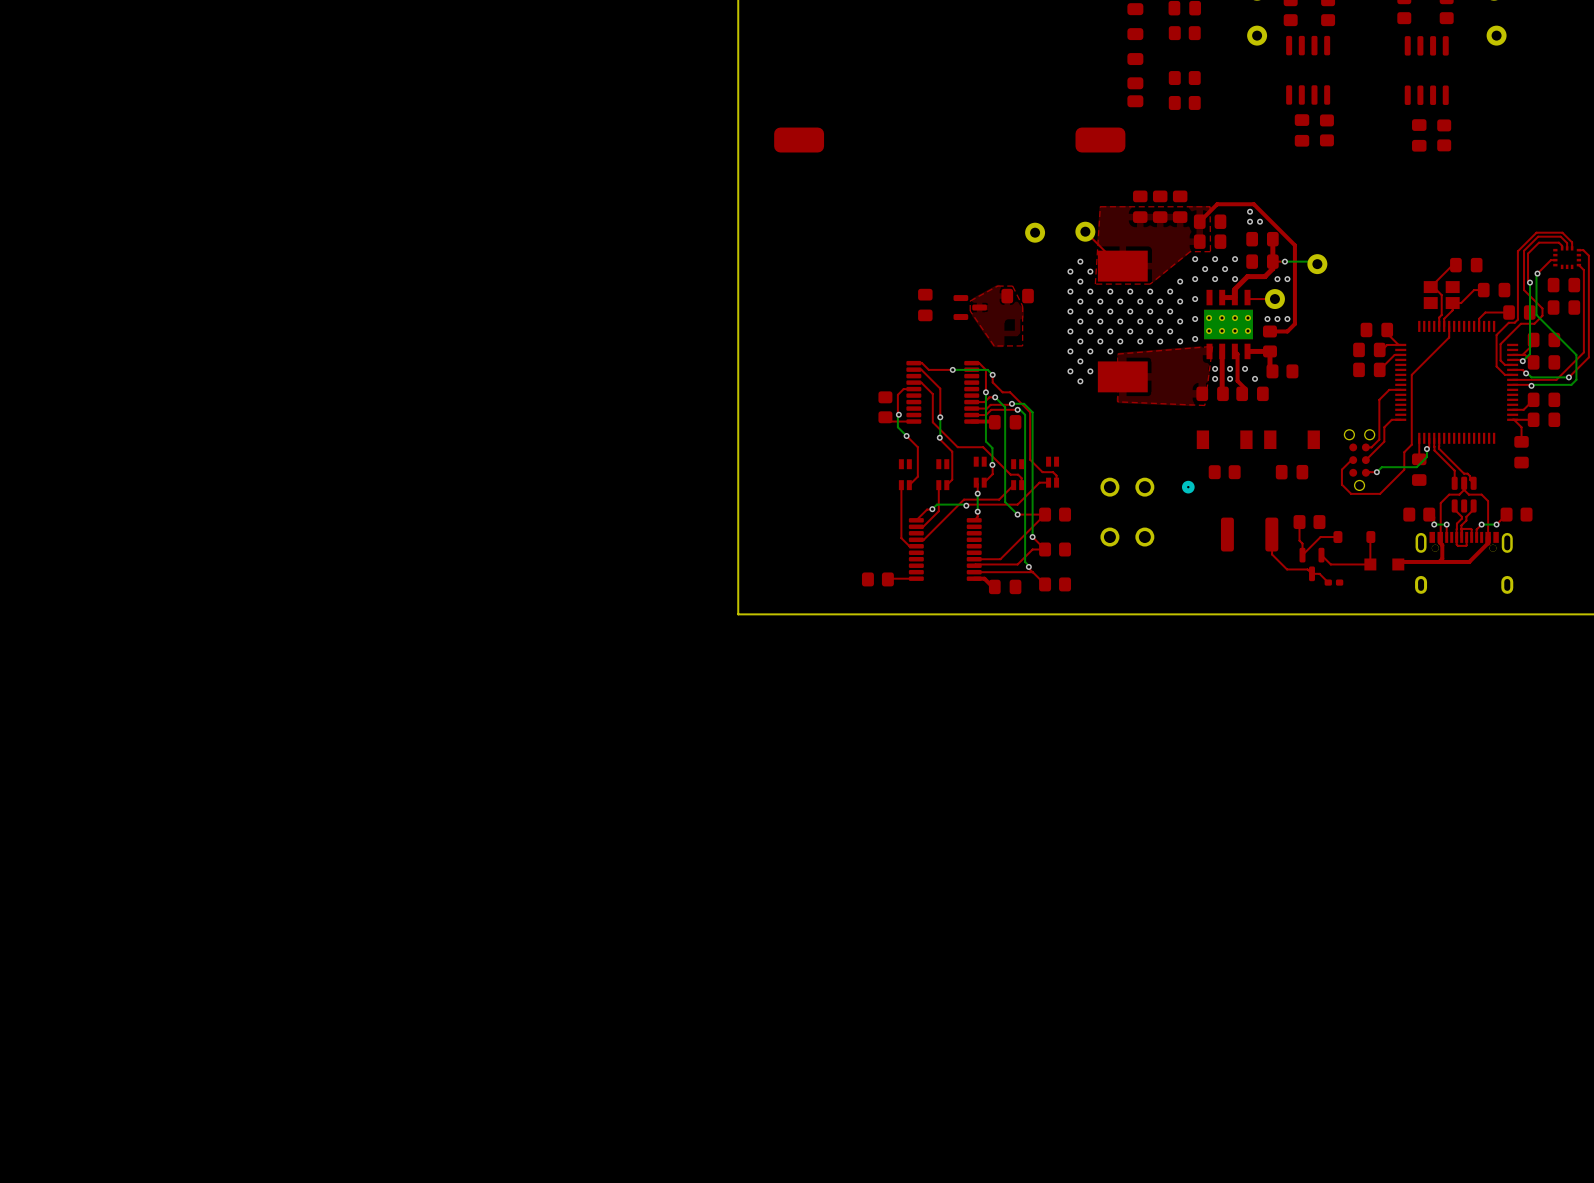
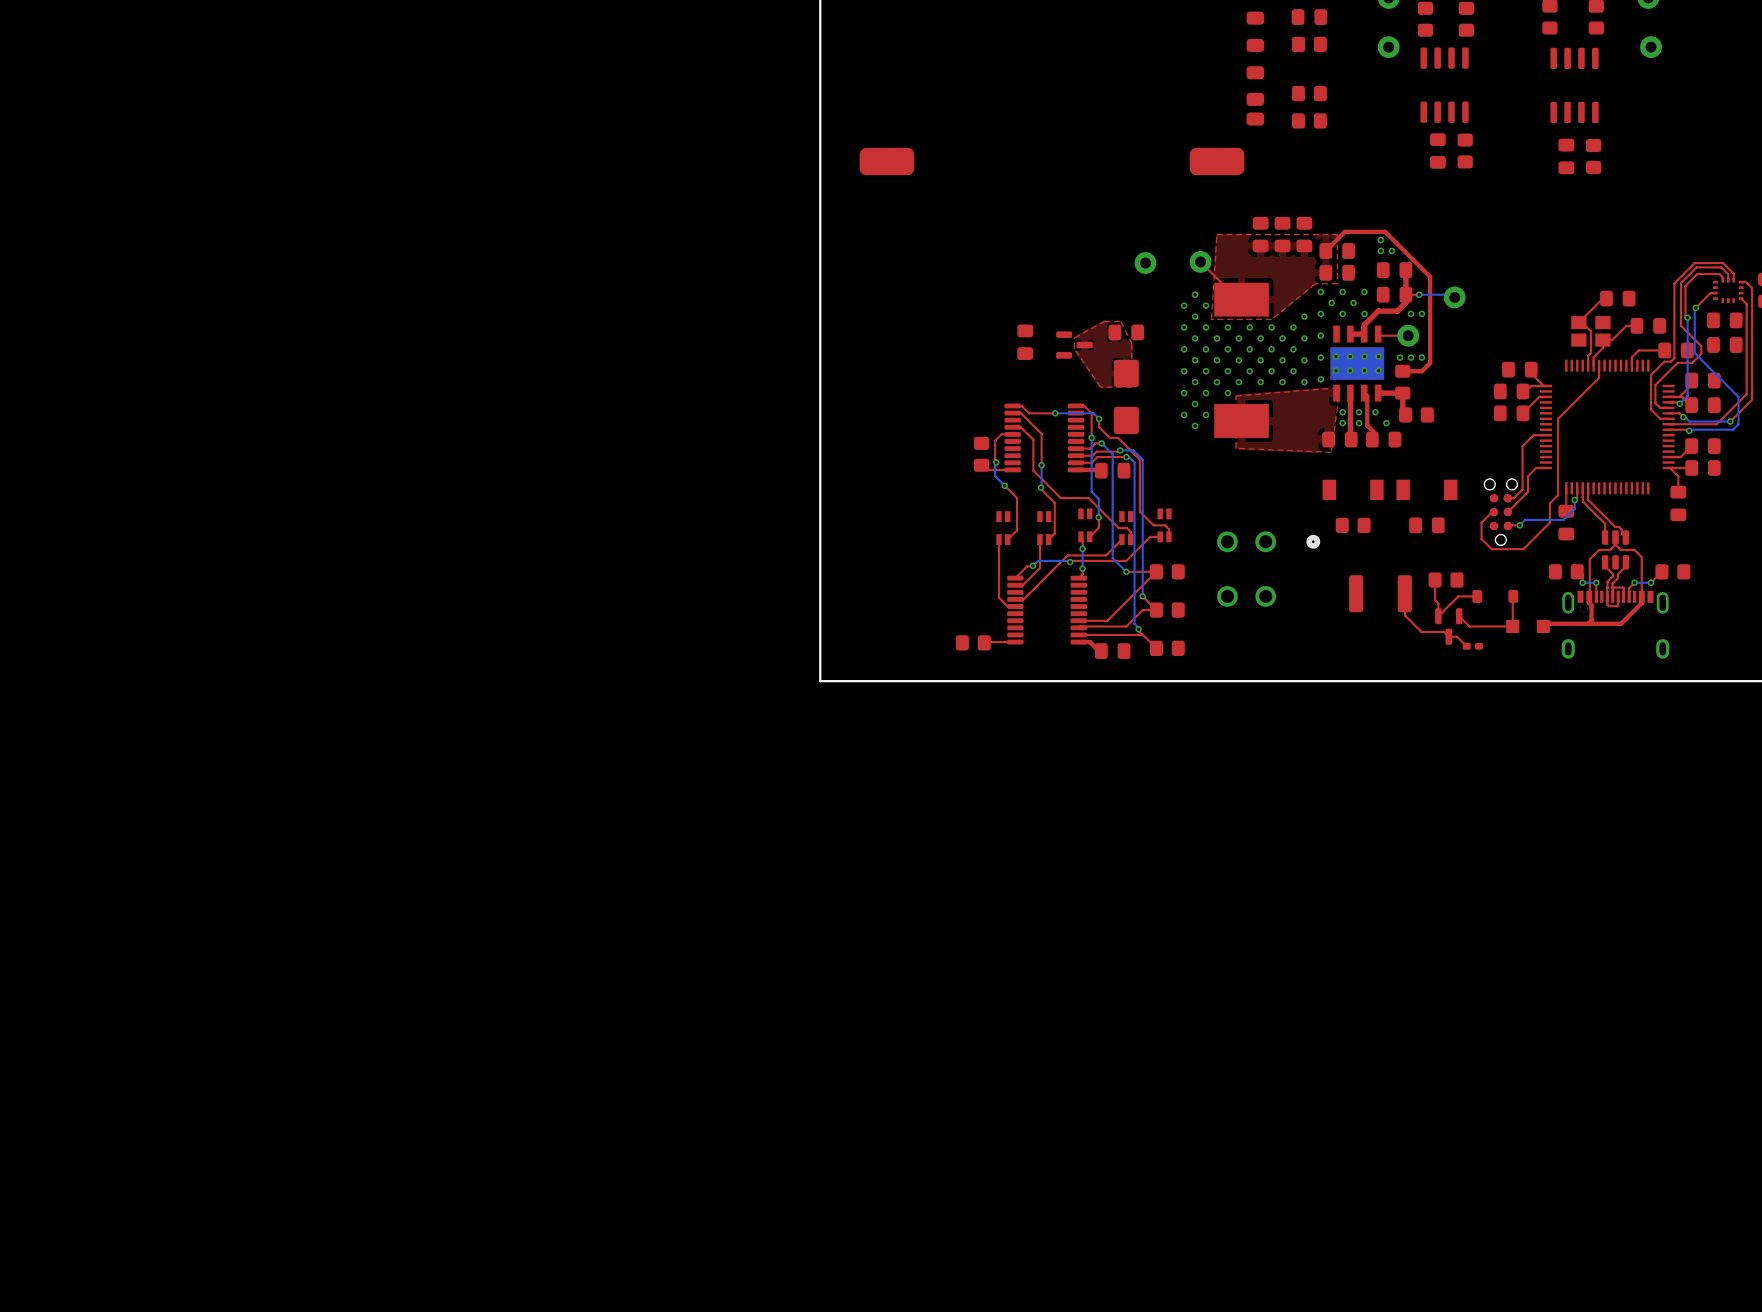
part: none -> (1126, 396)

